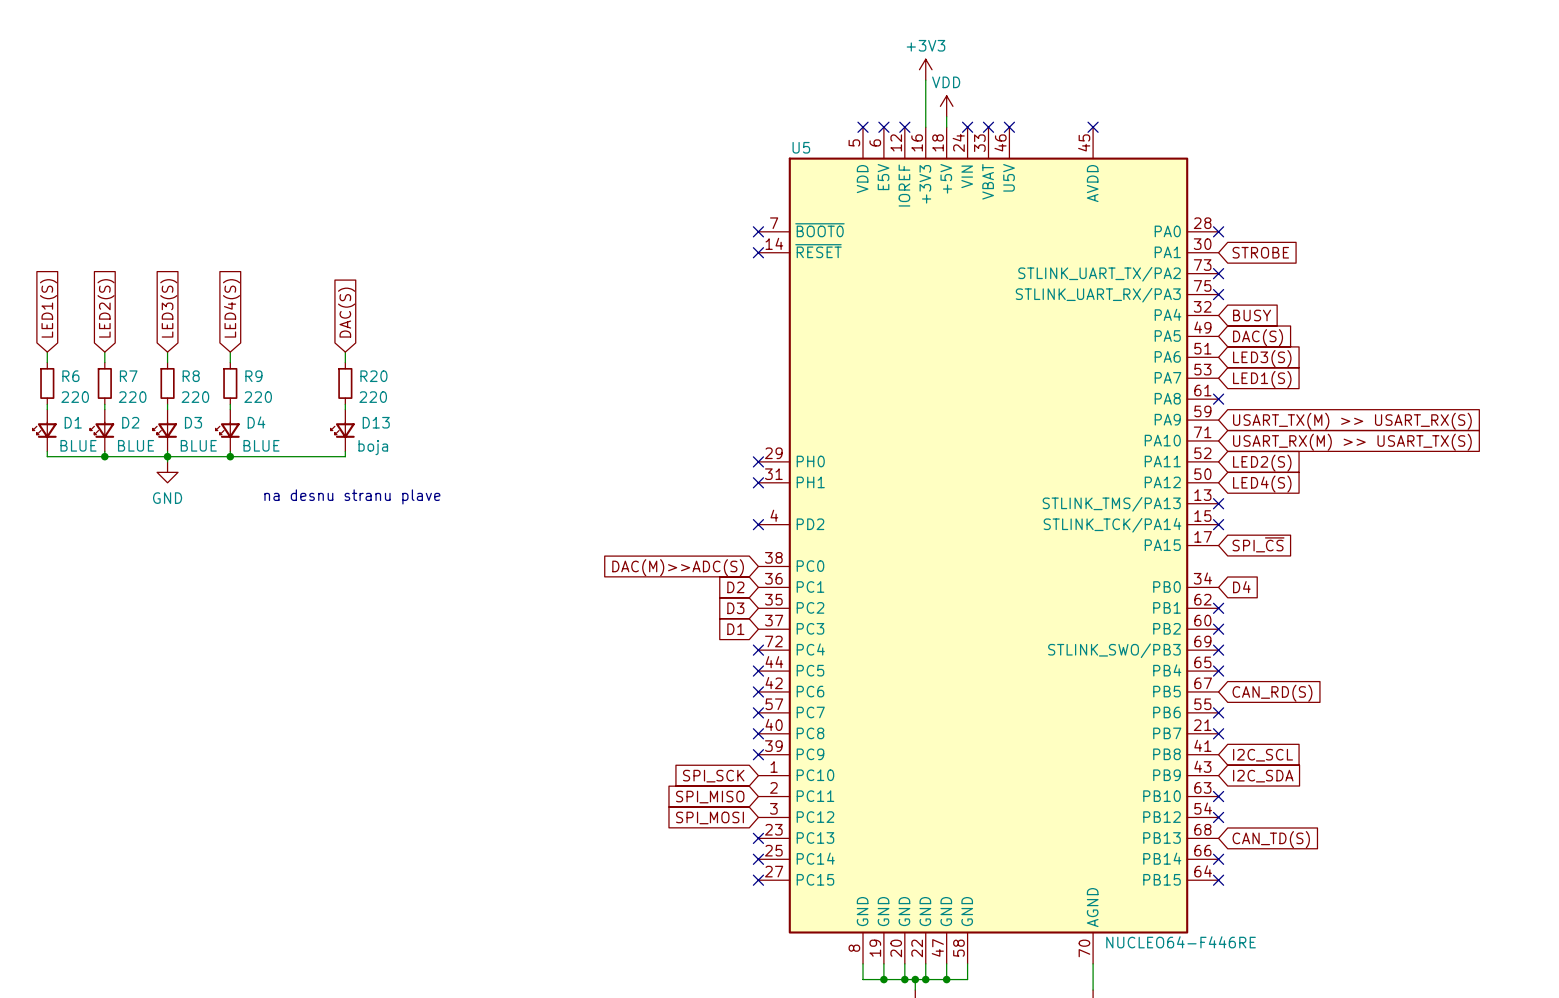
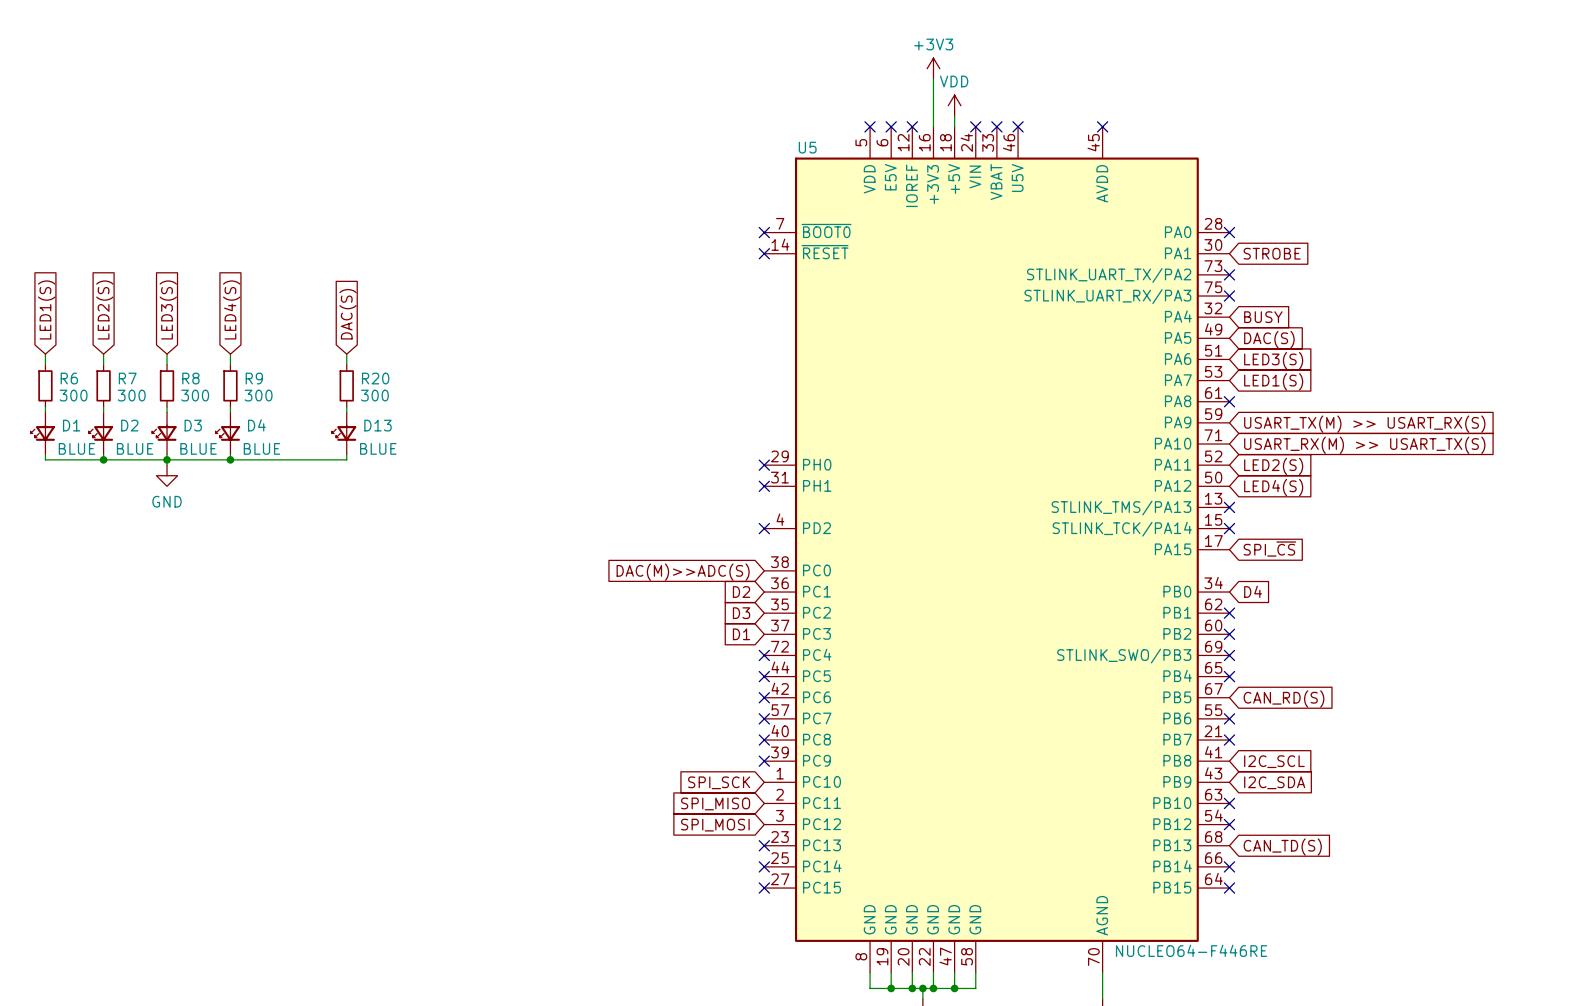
R6 value: 220 (75, 397) -> 300 (73, 395)
R7 value: 220 (132, 397) -> 300 (131, 395)
R8 value: 220 (195, 397) -> 300 (195, 395)
R9 value: 220 (258, 397) -> 300 (258, 395)
R20 value: 220 (373, 397) -> 300 (374, 395)
D13 value: boja (373, 447) -> BLUE (378, 448)
text: na desnu stranu plave (352, 496) -> none

